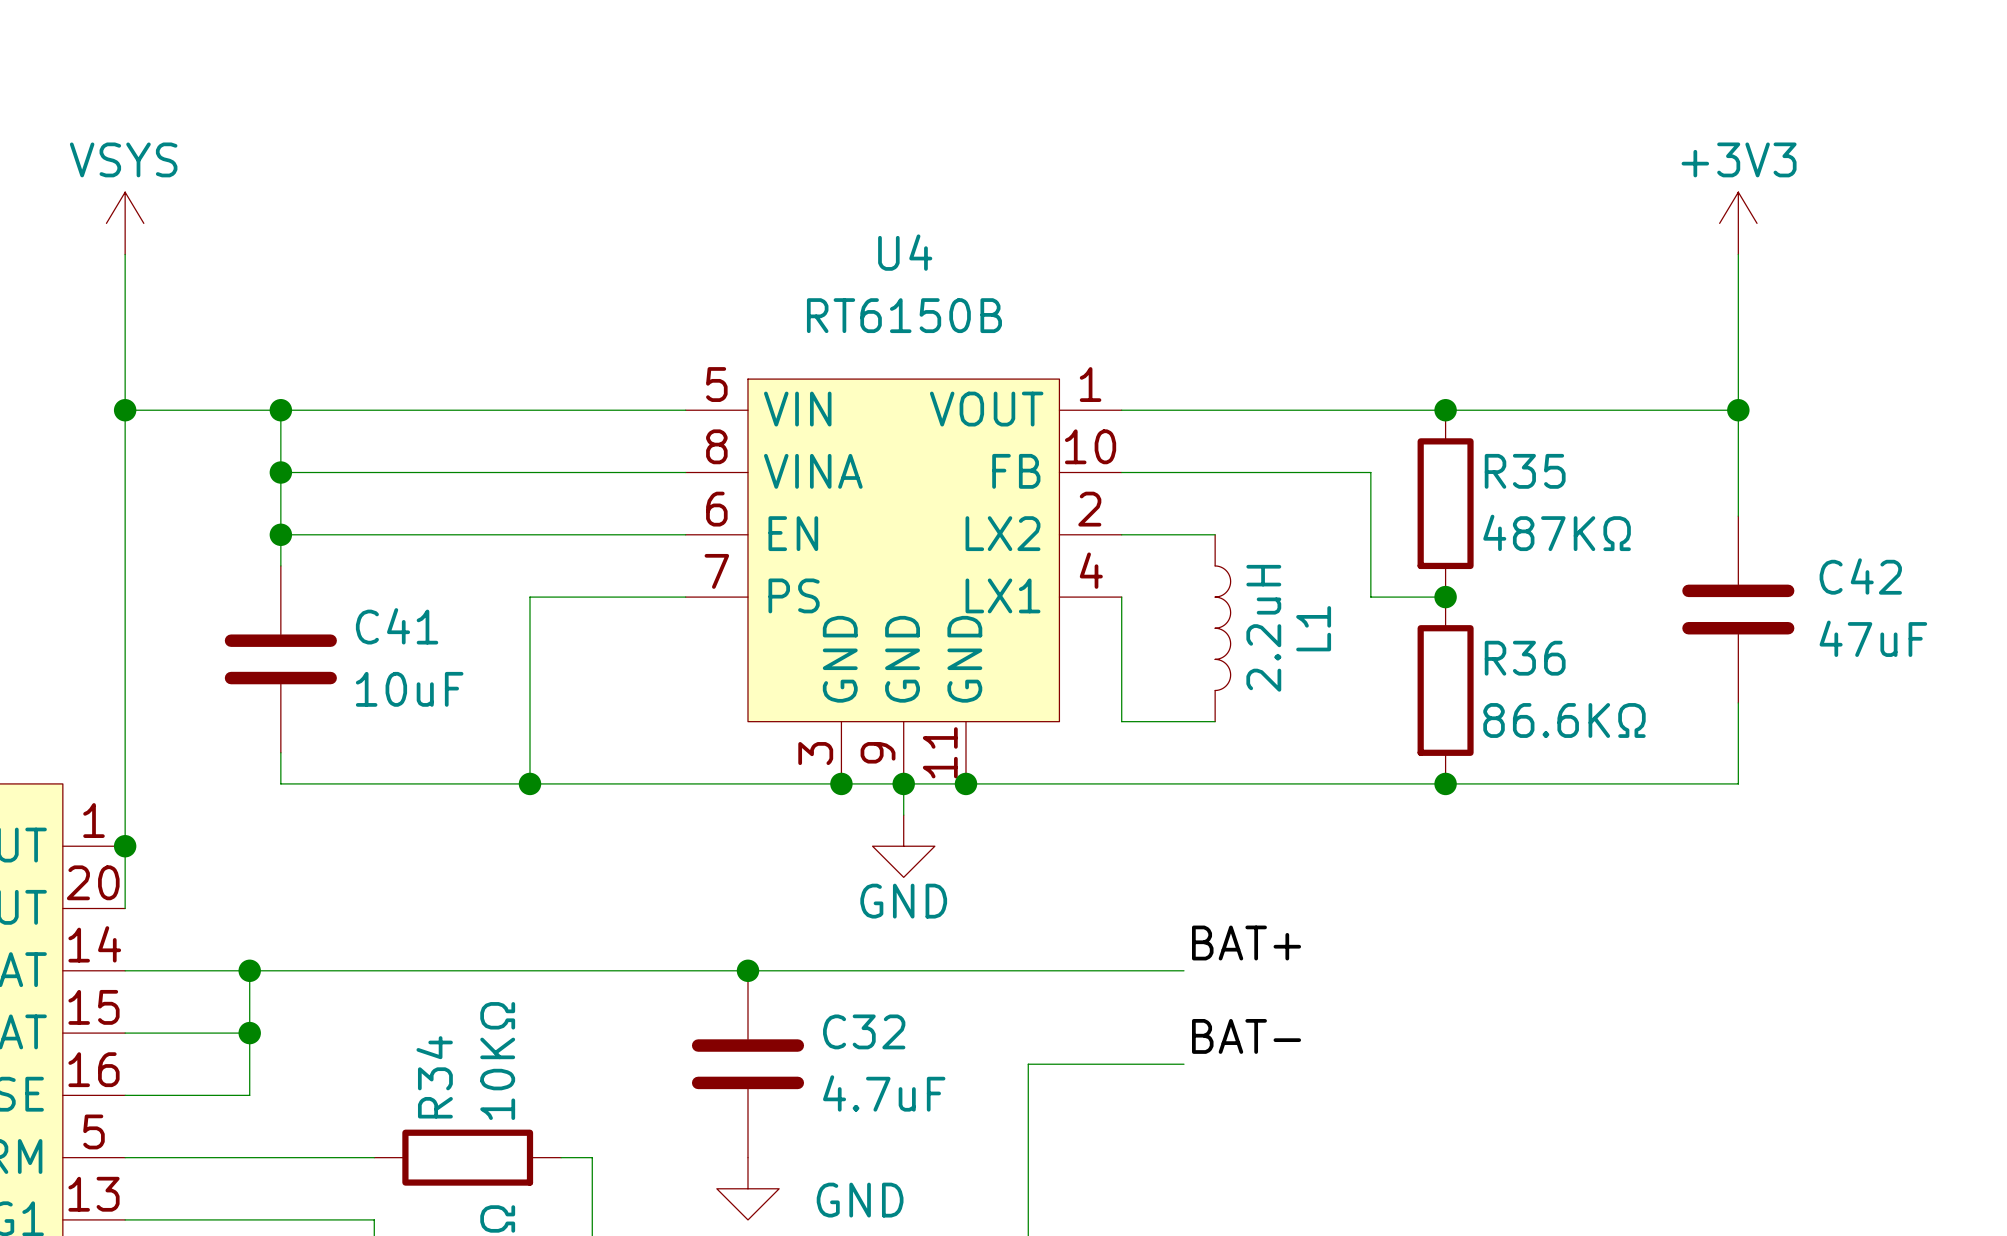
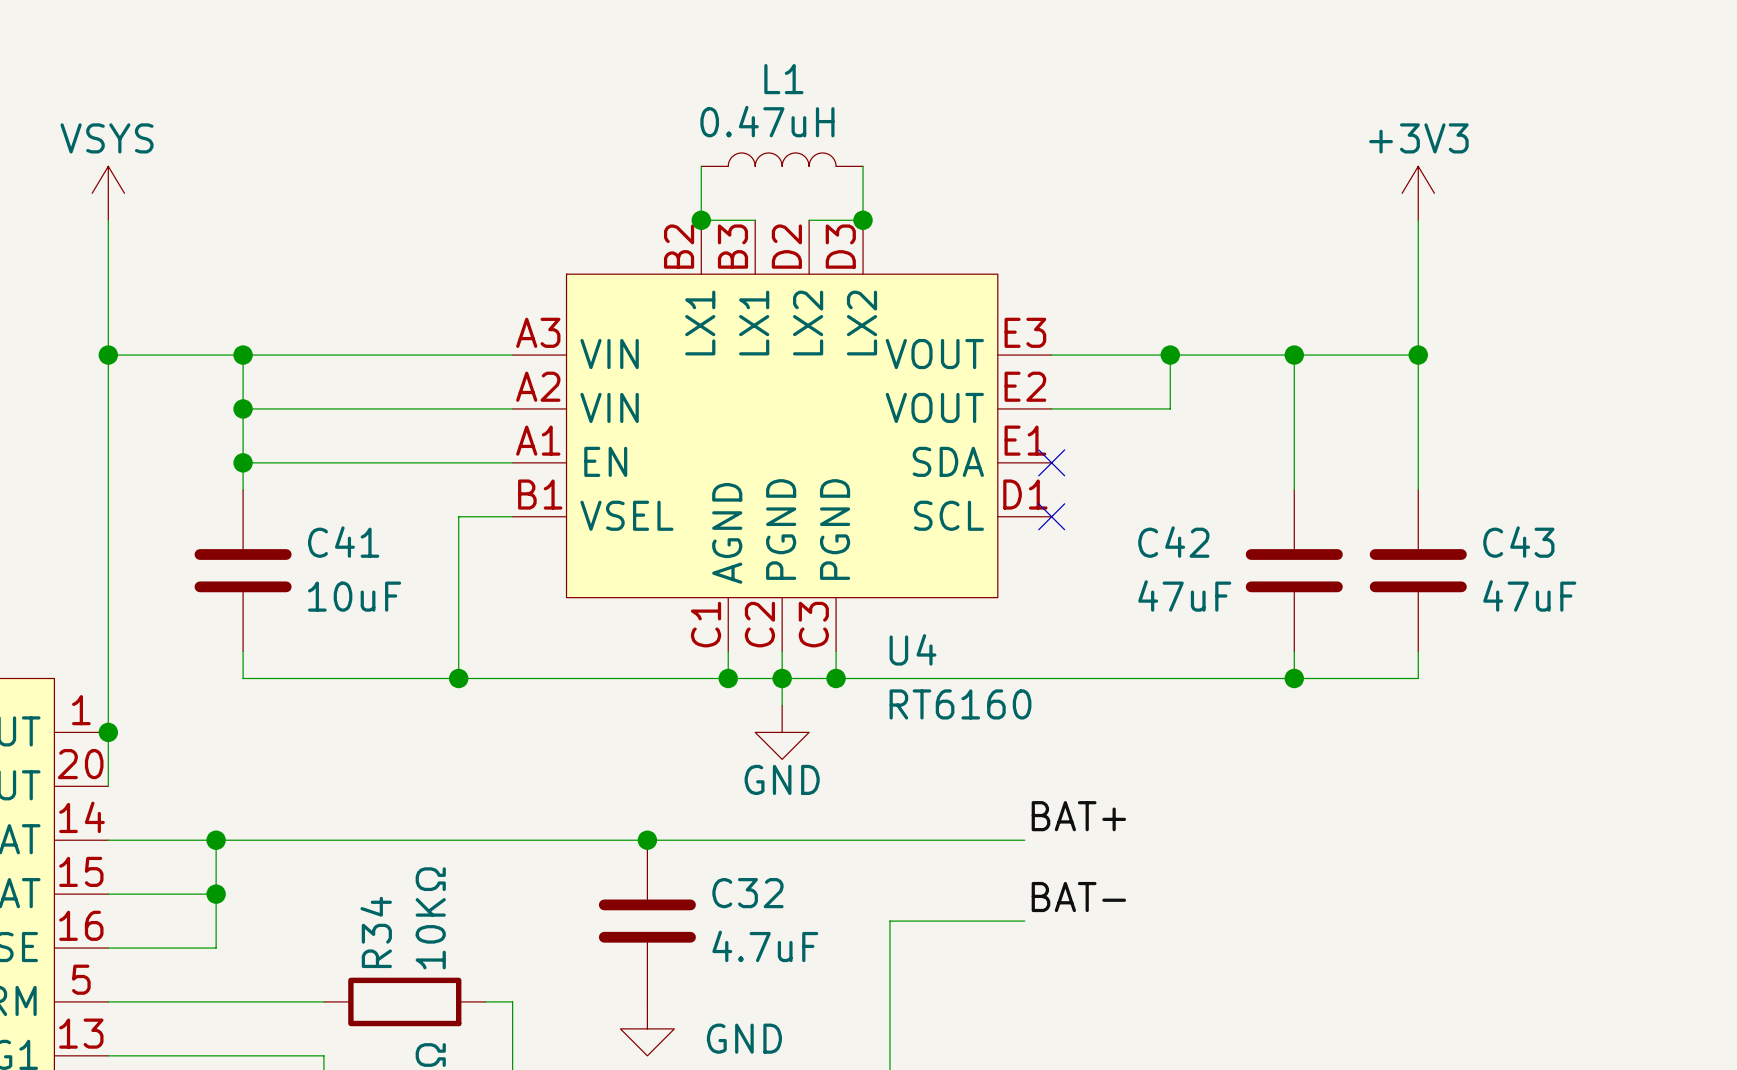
wire: none -> (701, 166) (701, 220) (755, 220)
wire: none -> (863, 166) (863, 220) (809, 220)
power symbol position: +3V3 (1738, 223) -> +3V3 (1418, 193)
U4 name position: U4 (905, 252) -> U4 (912, 649)
junction: none -> (701, 220)
junction: none -> (863, 220)
wire: none -> (1418, 220) (1418, 489)
wire: (1738, 254) (1738, 516) -> none
U4 value: RT6150B (904, 315) -> RT6160 (960, 704)
U4 symbol: [685, 379, 1122, 784] -> [512, 220, 1052, 652]
junction: none -> (1170, 355)
junction: (1445, 410) -> none
wire: none -> (1294, 355) (1294, 489)
junction: none -> (1294, 355)
wire: (1638, 410) (1738, 410) -> none
junction: none -> (1418, 355)
junction: (1738, 410) -> none
wire: (1352, 472) (1370, 472) (1370, 597) (1445, 597) -> (1170, 408) (1170, 355)
R35: 487KΩ (1445, 503) -> none
no-connect mark: none -> (1051, 462)
C42 name position: C42 (1860, 576) -> C42 (1173, 542)
wire: (1121, 597) (1121, 721) (1215, 721) -> none
no-connect mark: none -> (1051, 516)
junction: (1445, 597) -> none
C42 position: (1738, 609) -> (1294, 570)
L1 rotation: 0° (1222, 628) -> 90° counterclockwise (782, 159)
L1 position: (1222, 628) -> (782, 159)
L1 value: 2.2uH (1263, 628) -> 0.47uH (767, 121)
C42 value position: 47uF (1873, 638) -> 47uF (1184, 595)
C43: none -> 47uF (1418, 570)
R36: 86.6KΩ (1445, 690) -> none
wire: (1738, 702) (1738, 783) (1638, 783) -> (1418, 651) (1418, 678)
wire: none -> (1294, 651) (1294, 678)
junction position: (1445, 783) -> (1294, 678)

